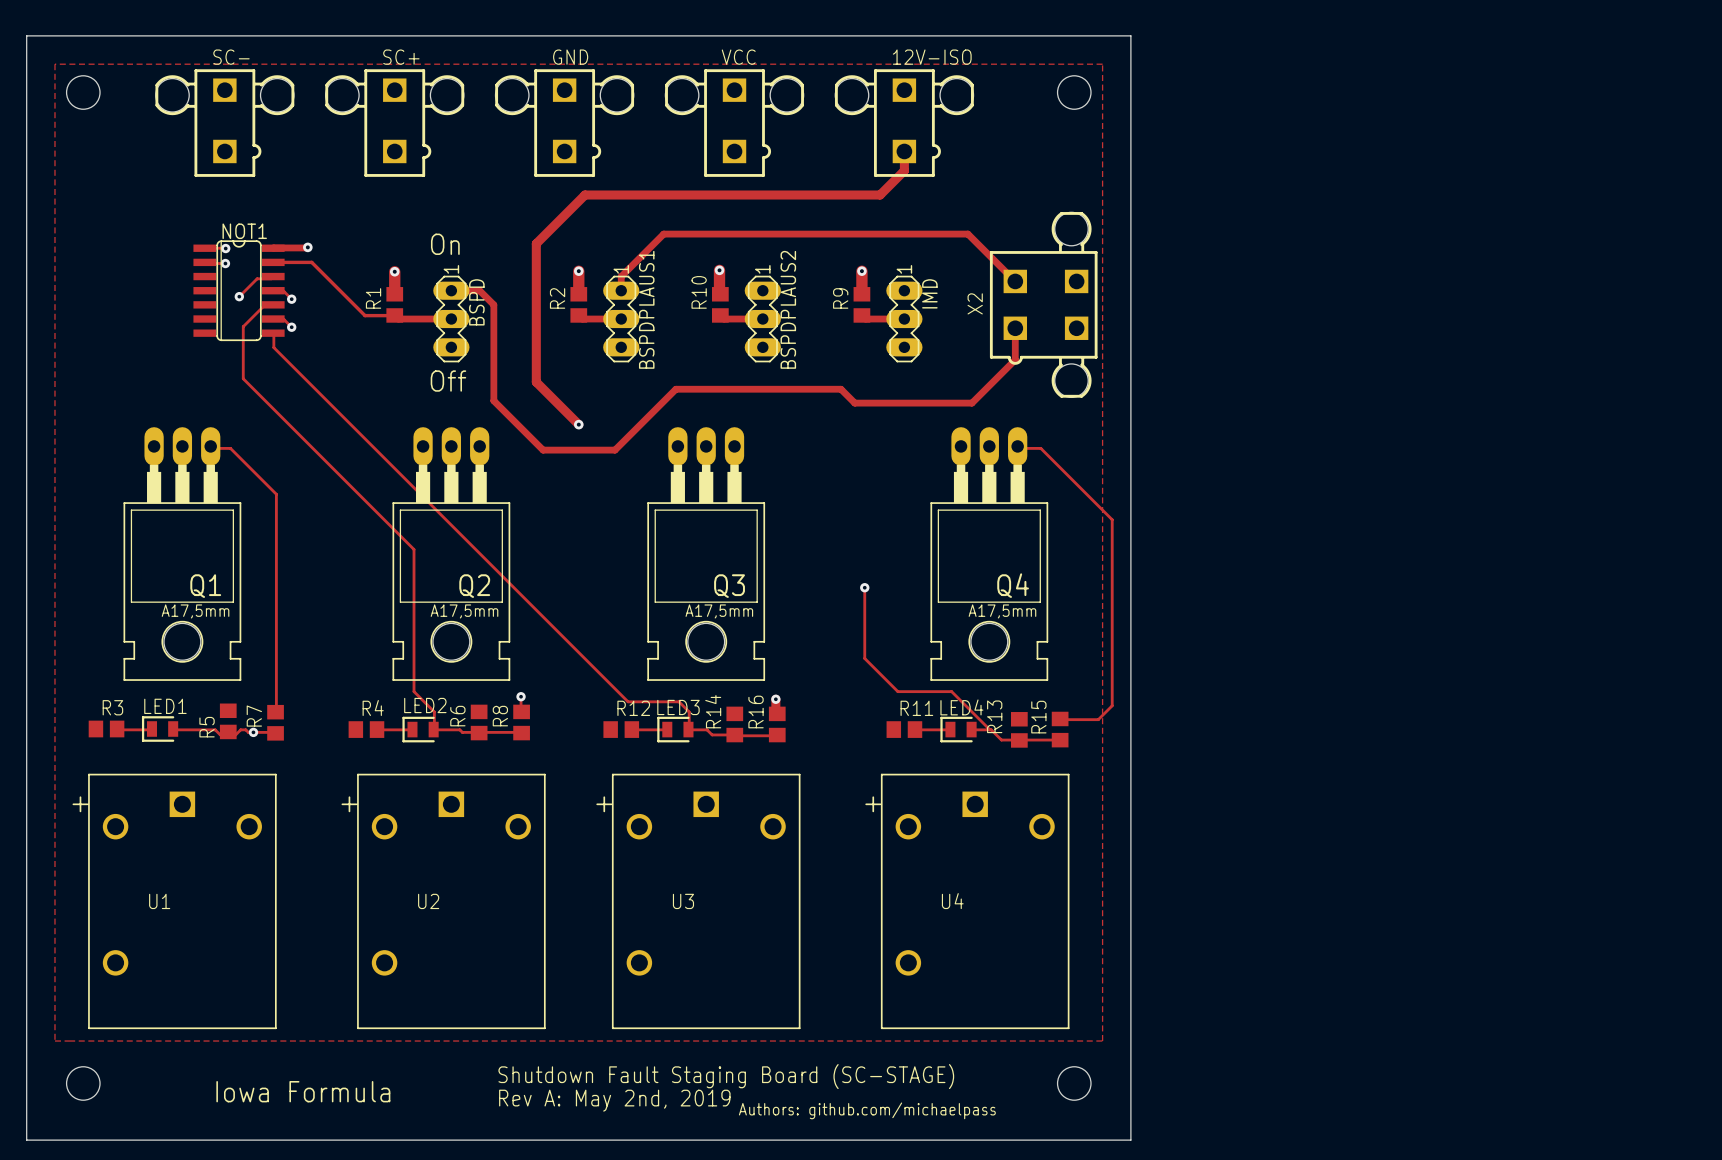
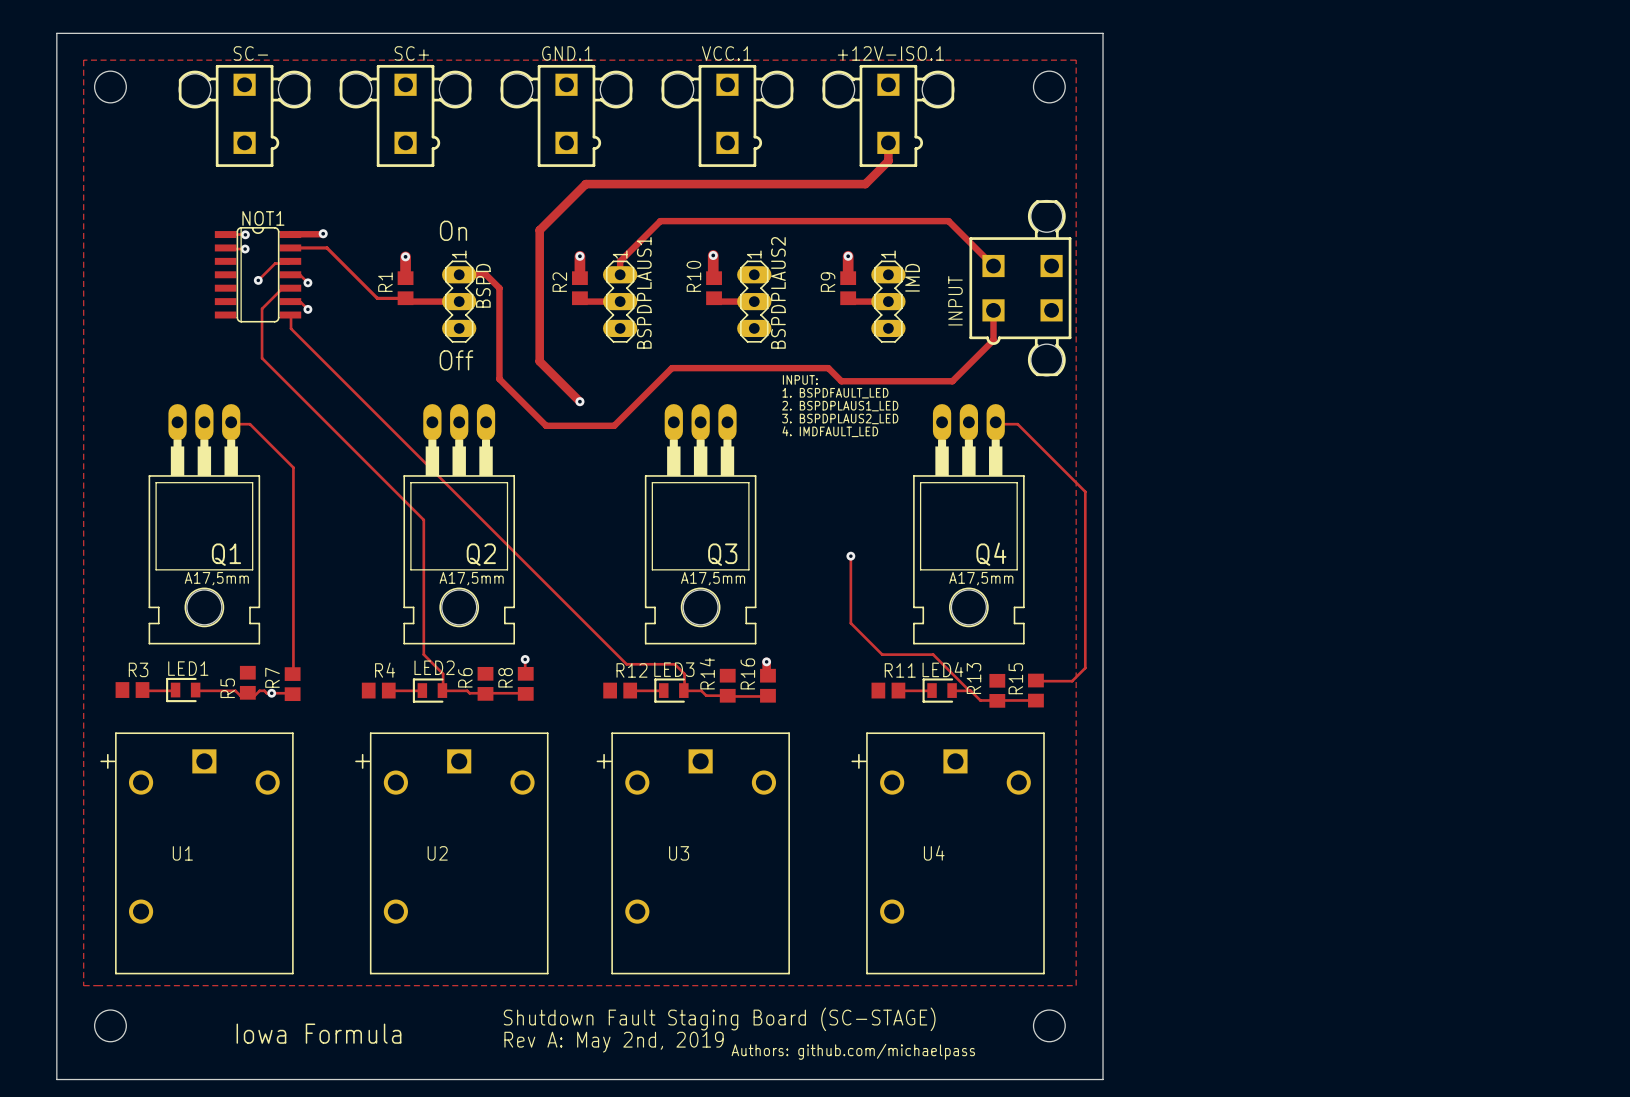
GND name: GND (570, 57) -> GND.1 (567, 53)
VCC name: VCC (738, 57) -> VCC.1 (726, 53)
12V-ISO name: 12V-ISO (932, 57) -> +12V-ISO.1 (890, 53)
X2 name: X2 (975, 303) -> INPUT (955, 300)
text: none -> INPUT: (800, 379)
text: none -> 1. BSPDFAULT_LED (835, 393)
text: none -> 2. BSPDPLAUS1_LED (840, 406)
text: none -> 3. BSPDPLAUS2_LED (840, 418)
text: none -> 4. IMDFAULT_LED (830, 431)

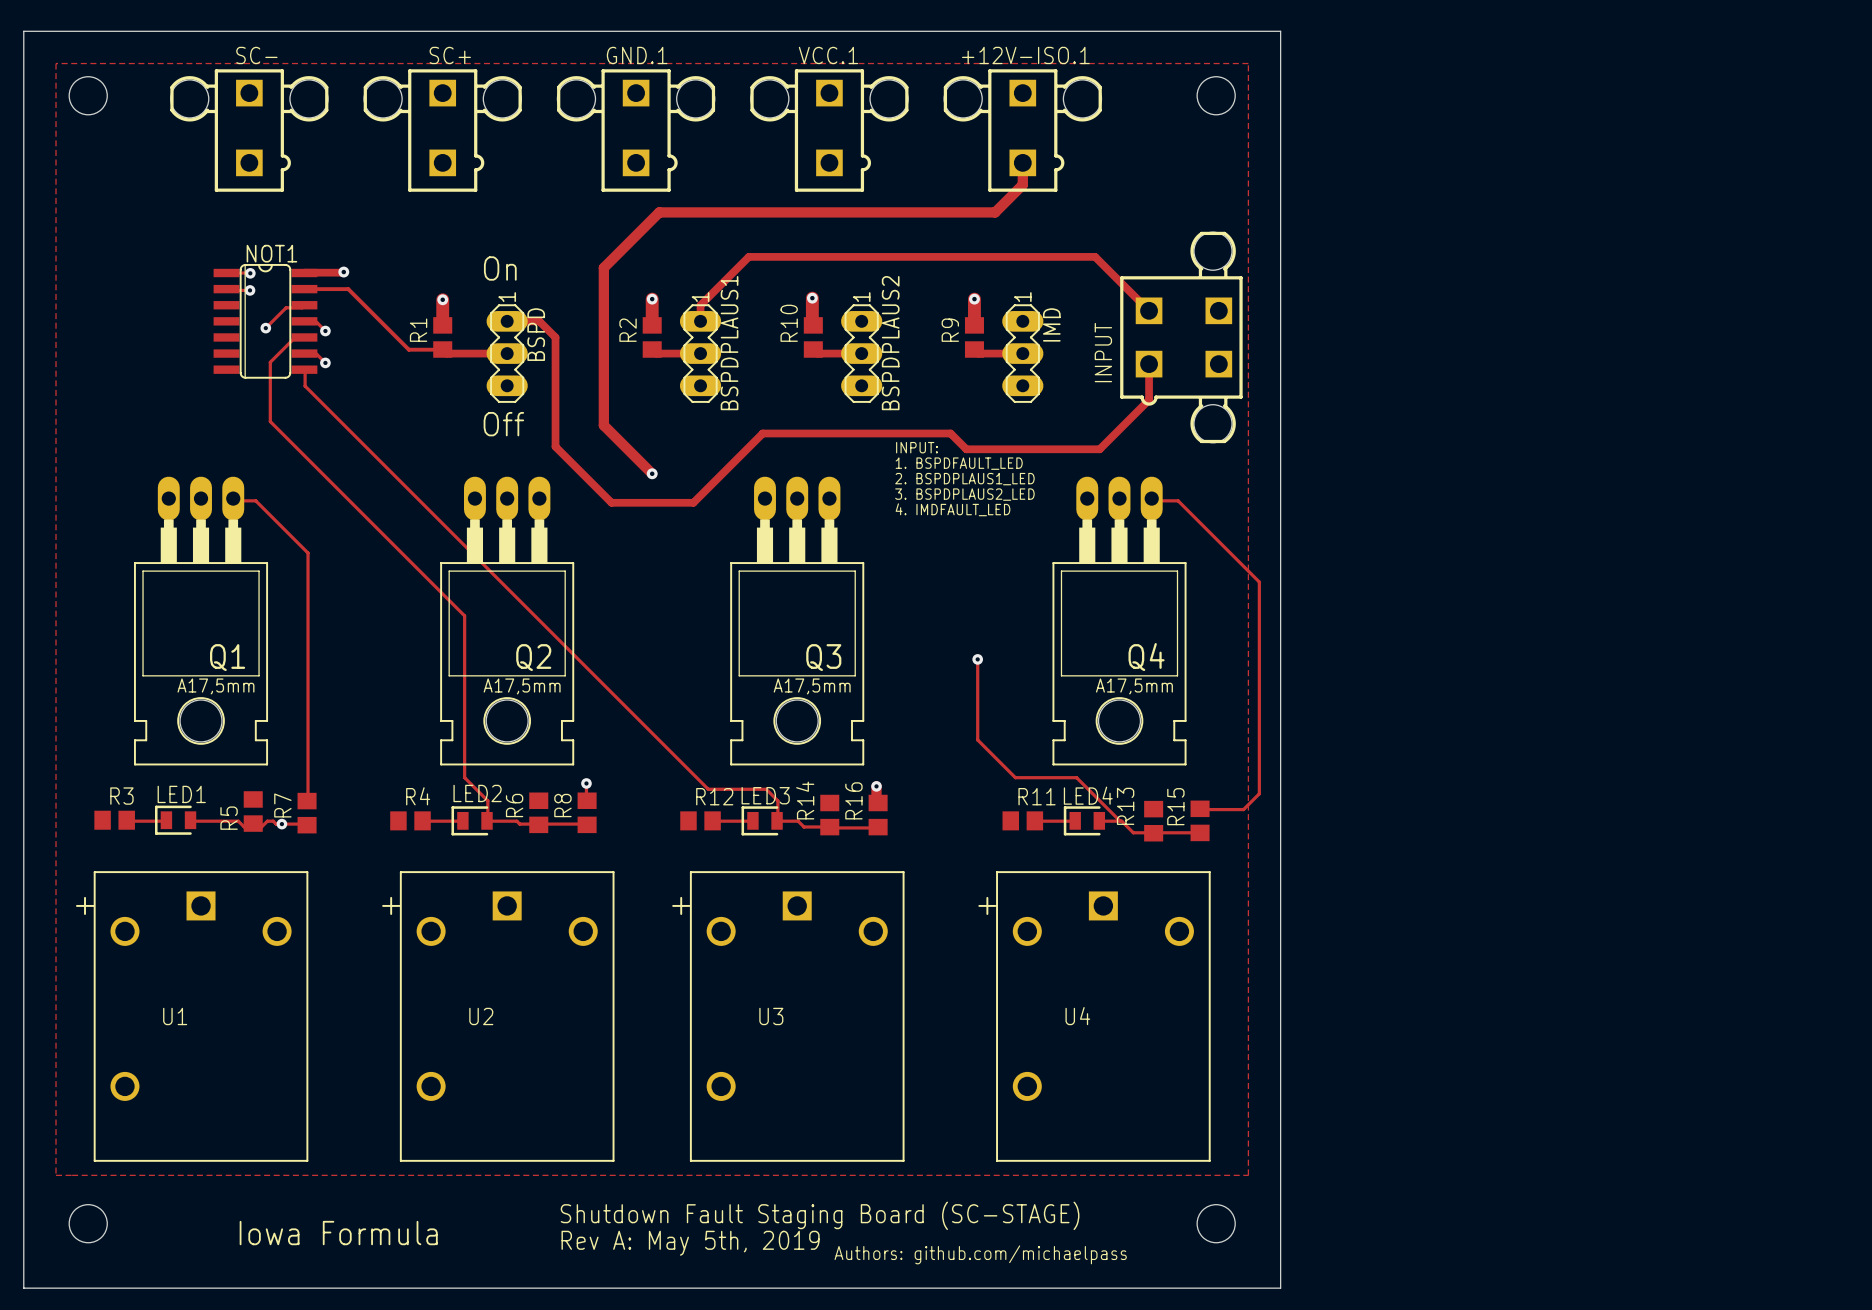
text: Rev A: May 2nd, 2019 (614, 1042) -> Rev A: May 5th, 2019 (690, 1243)

